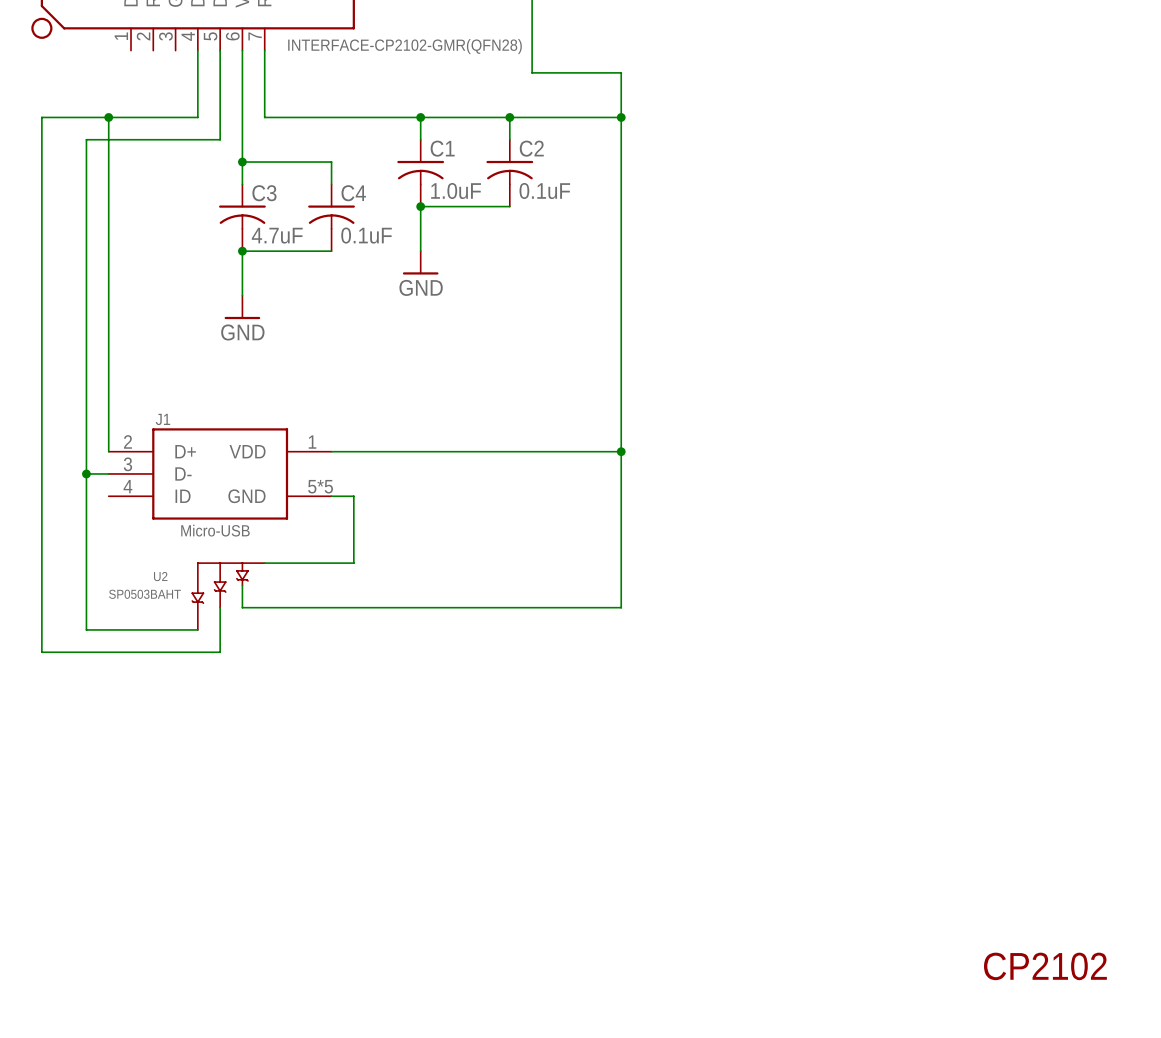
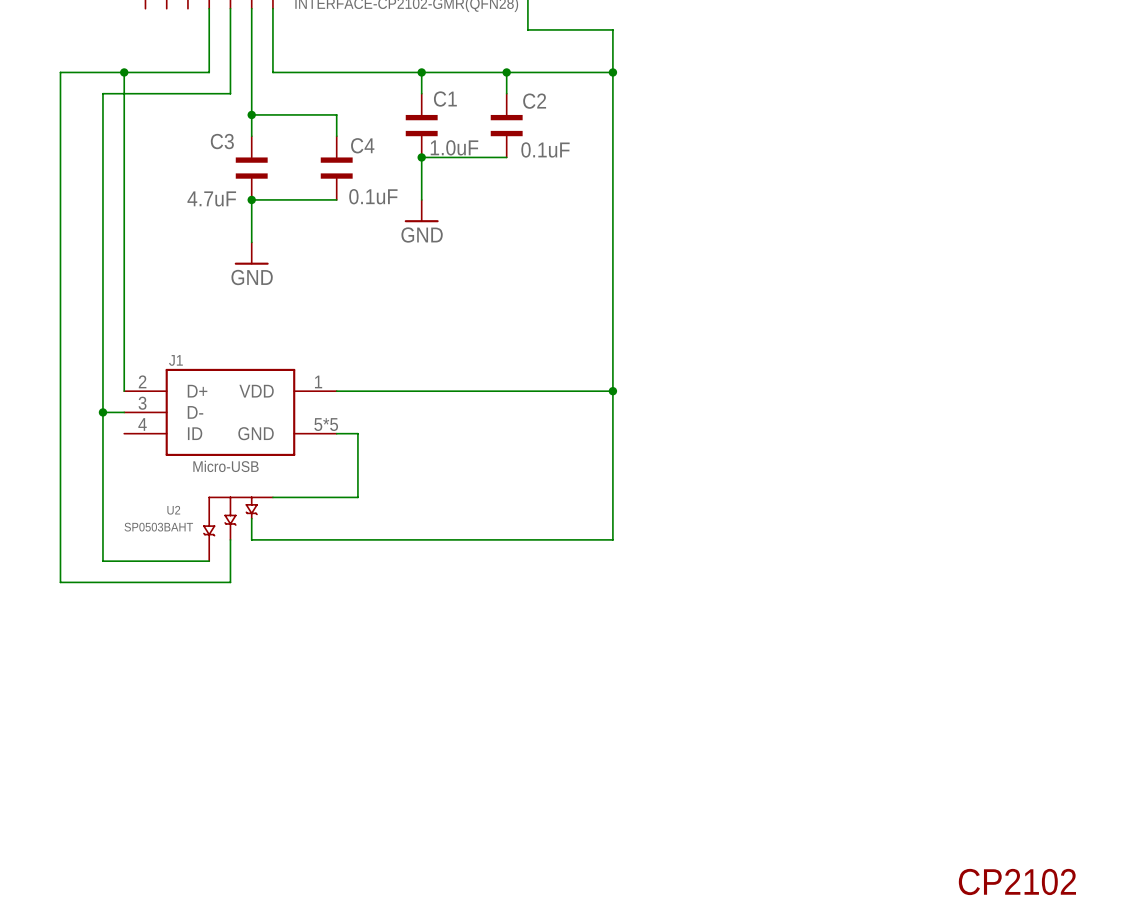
C1 symbol: [397, 139, 445, 207] -> [405, 93, 438, 158]
C2 symbol: [486, 139, 534, 207] -> [490, 93, 523, 158]
C3 symbol: [219, 184, 266, 252] -> [235, 136, 268, 200]
C4 symbol: [308, 184, 355, 252] -> [320, 136, 353, 200]
C1 value position: 1.0uF (456, 190) -> 1.0uF (454, 147)
C3 name position: C3 (264, 193) -> C3 (222, 141)
C3 value position: 4.7uF (277, 235) -> 4.7uF (211, 198)
C4 value position: 0.1uF (366, 235) -> 0.1uF (373, 196)

